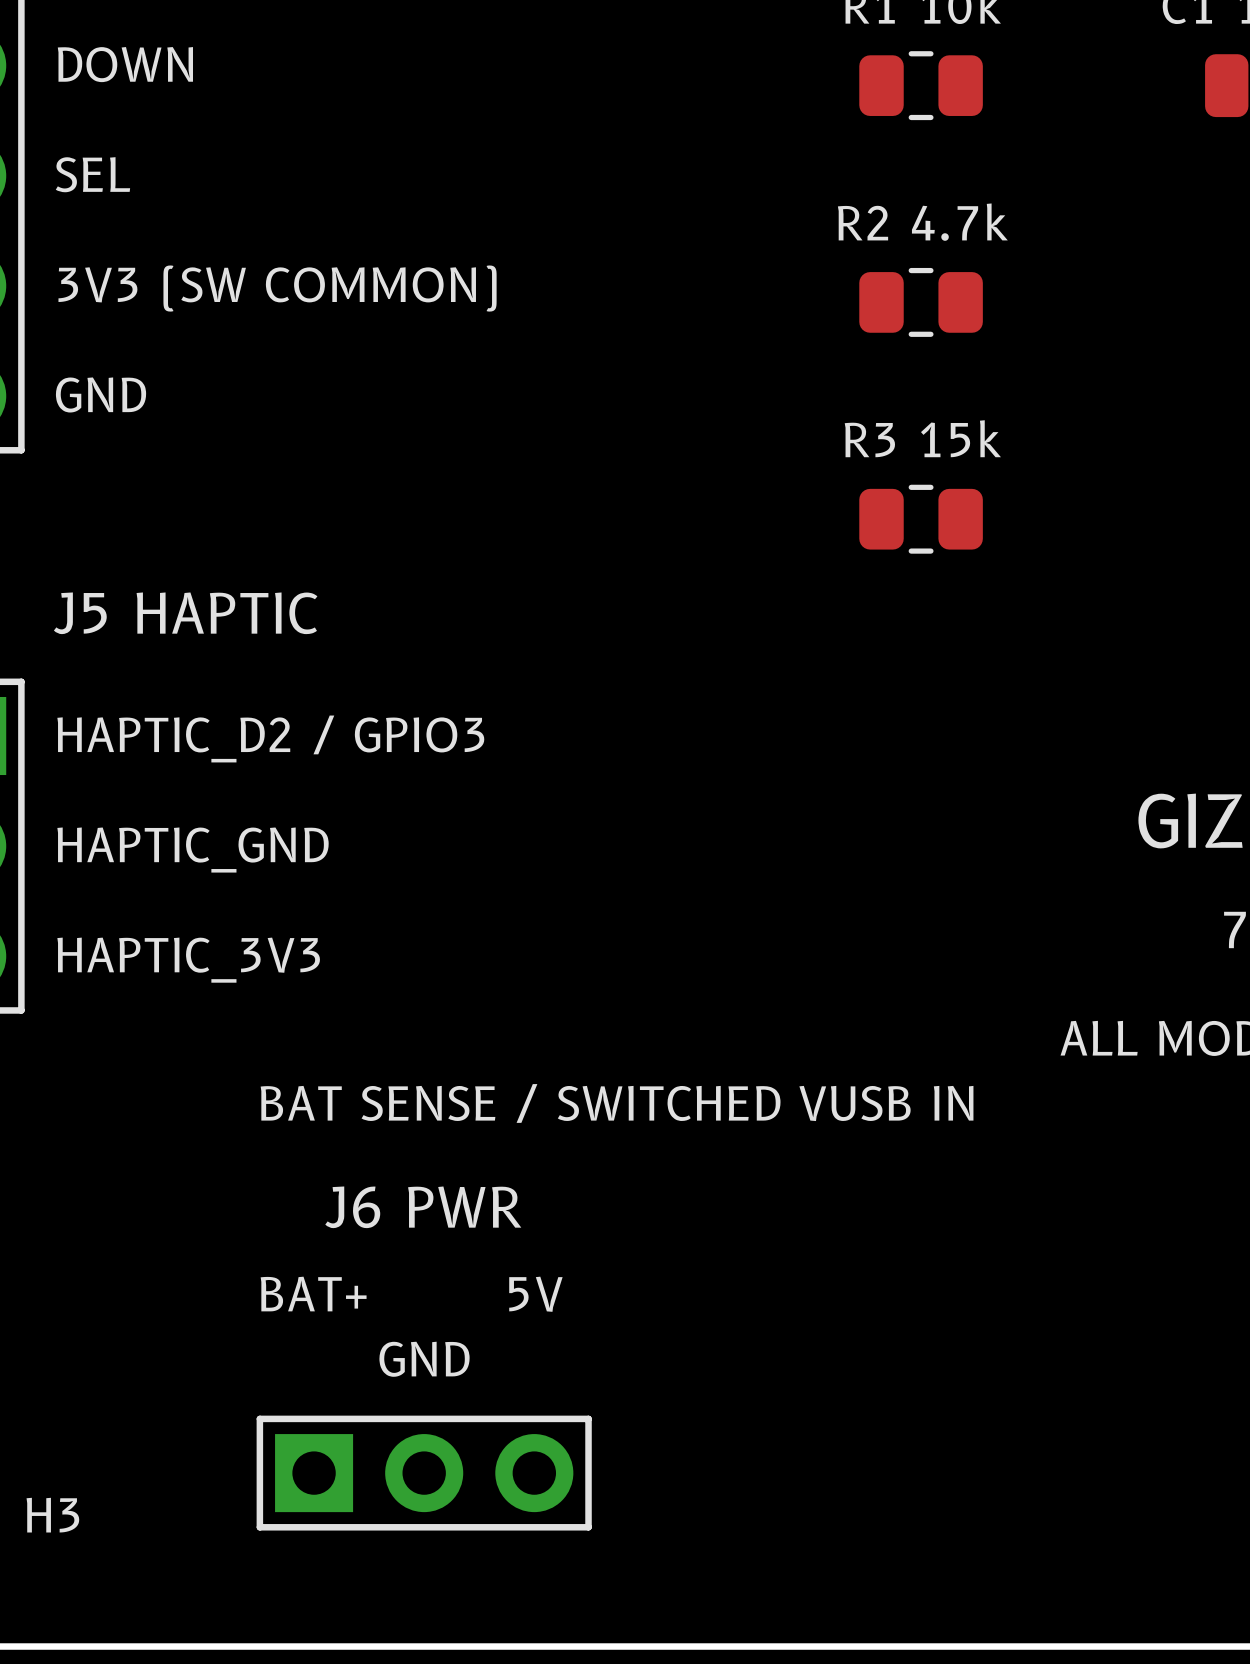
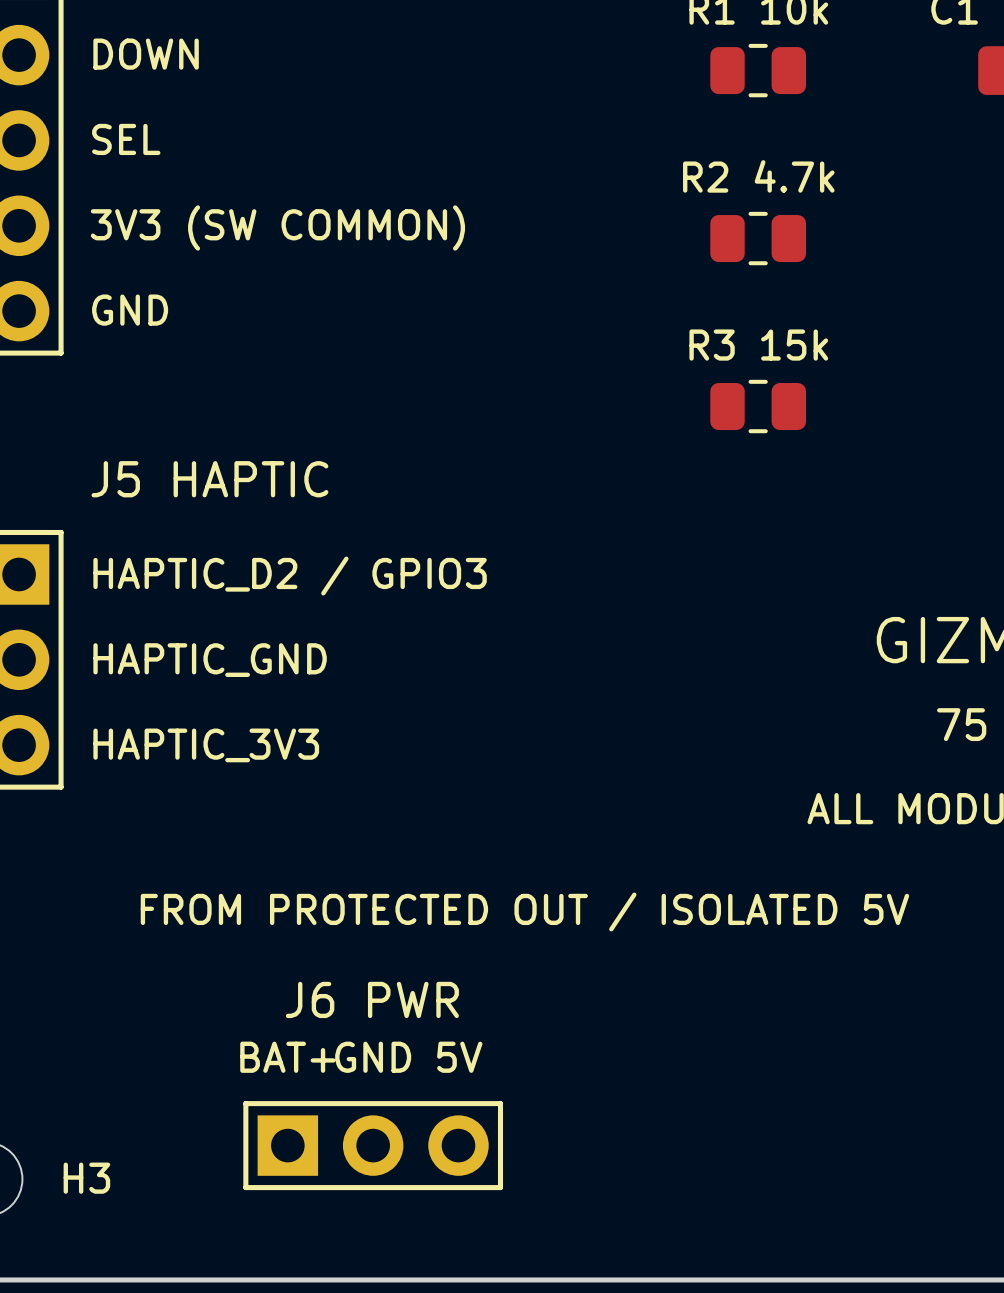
text: BAT SENSE / SWITCHED VUSB IN (617, 1103) -> none
text: none -> FROM PROTECTED OUT / ISOLATED 5V (524, 911)
text position: J6 PWR (423, 1207) -> J6 PWR (372, 999)
text position: BAT+ (313, 1294) -> BAT+ (287, 1057)
text position: 5V (535, 1294) -> 5V (459, 1057)

